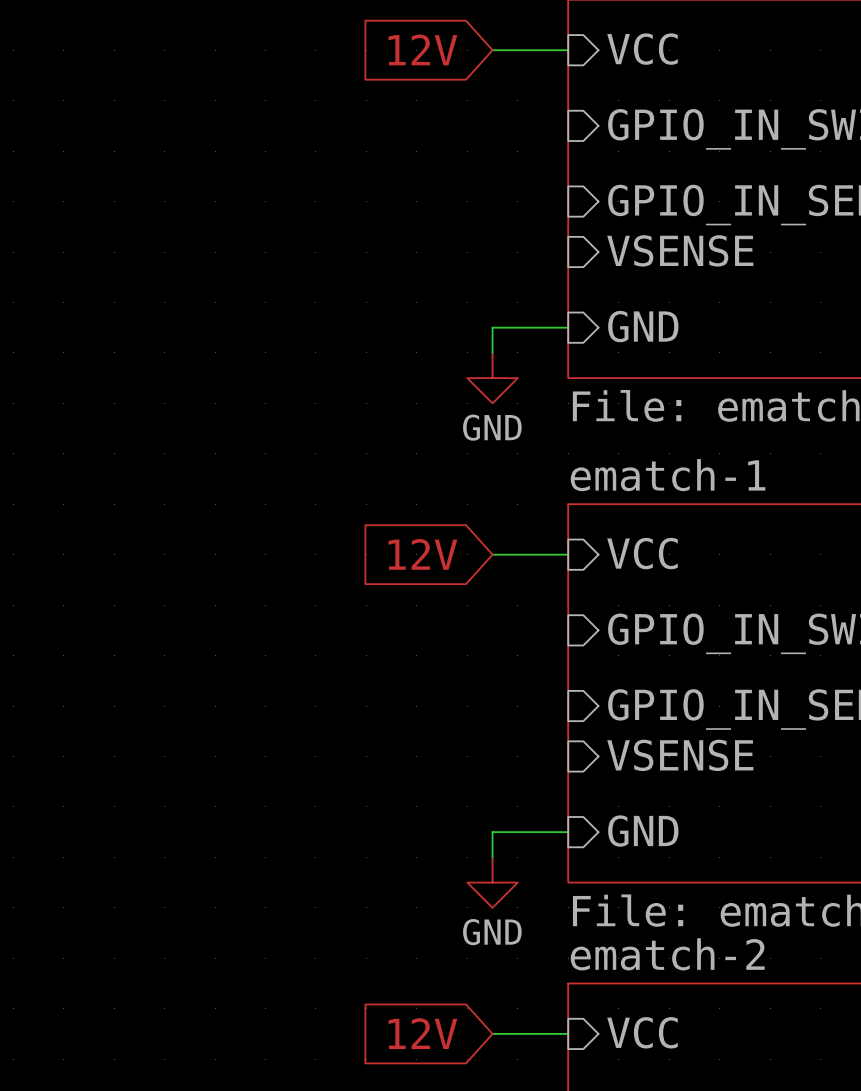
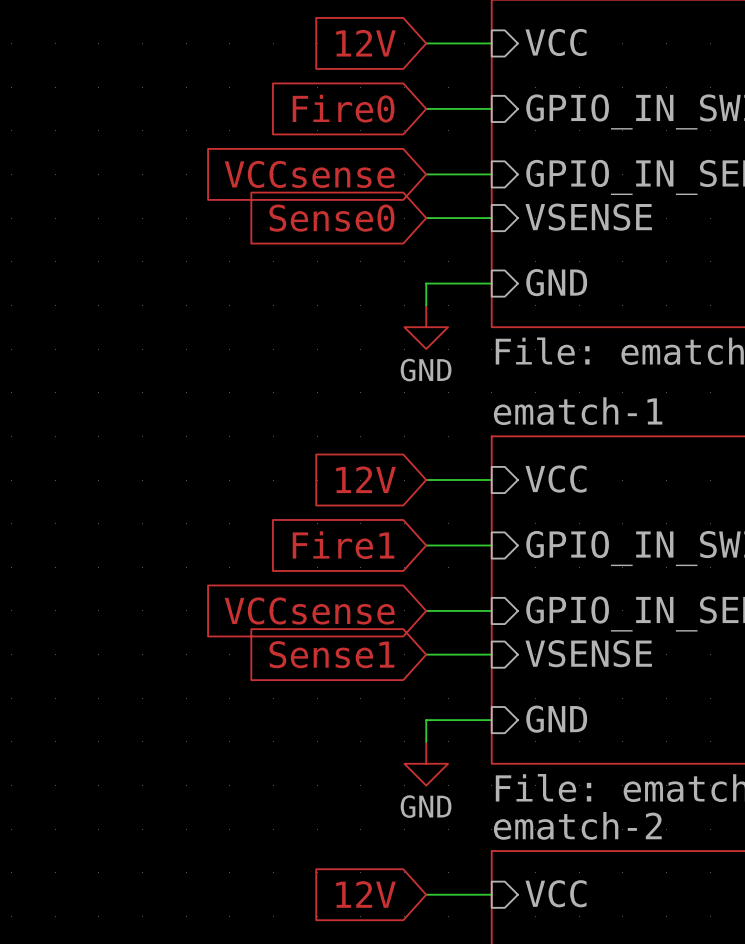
global label: none -> Fire0 (343, 108)
wire: none -> (426, 108) (491, 108)
global label: none -> VCCsense (309, 174)
wire: none -> (426, 174) (491, 174)
global label: none -> Sense0 (331, 218)
wire: none -> (426, 218) (491, 218)
global label: none -> Fire1 (343, 545)
wire: none -> (426, 545) (491, 545)
global label: none -> VCCsense (309, 610)
wire: none -> (426, 610) (491, 610)
global label: none -> Sense1 (331, 654)
wire: none -> (426, 654) (491, 654)

